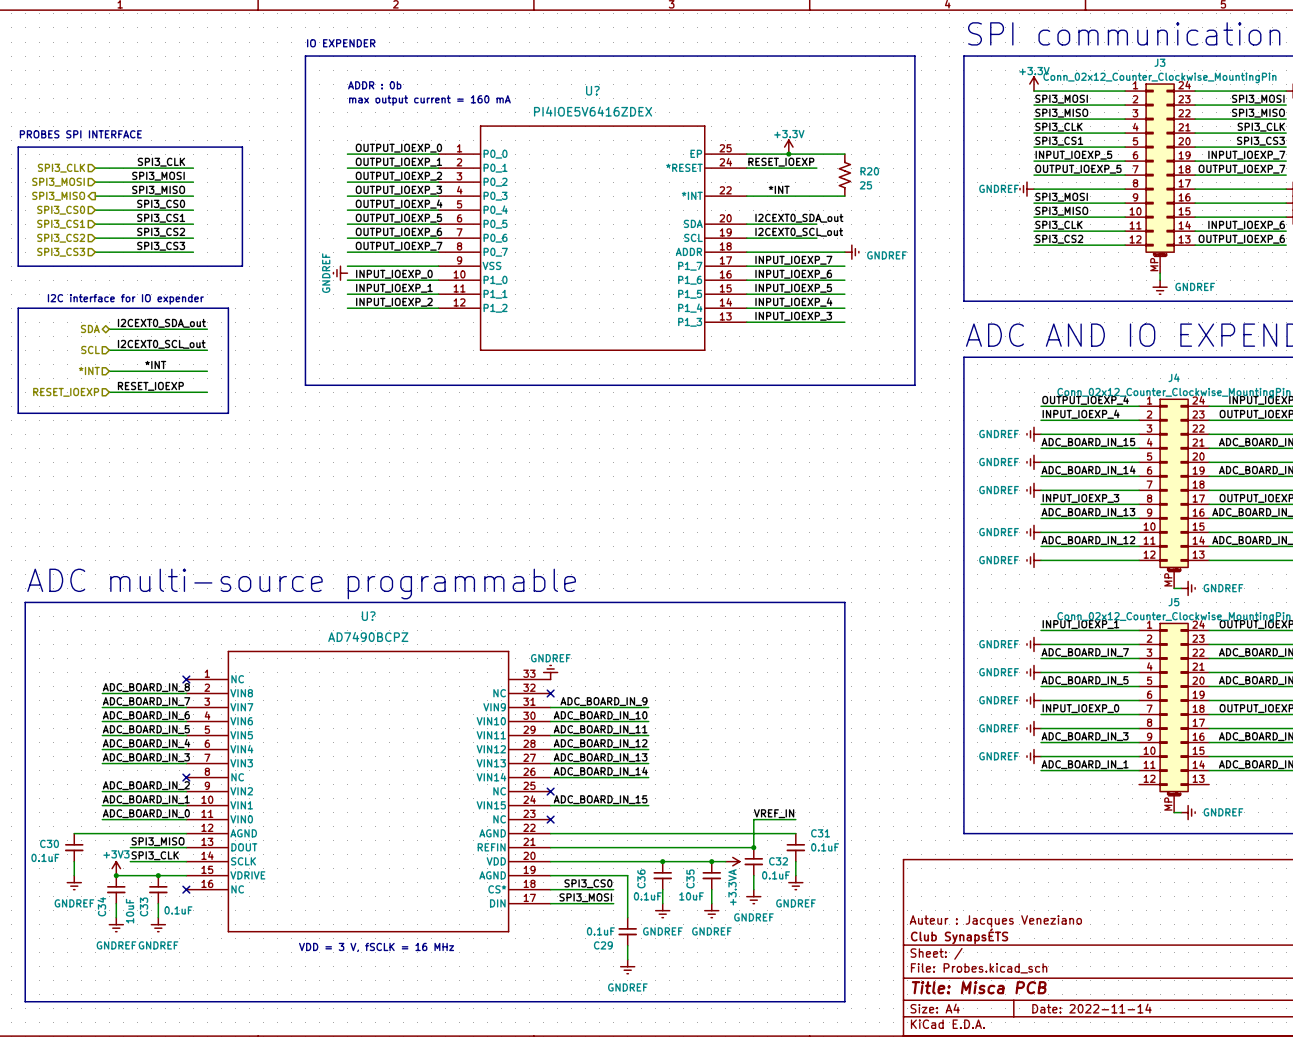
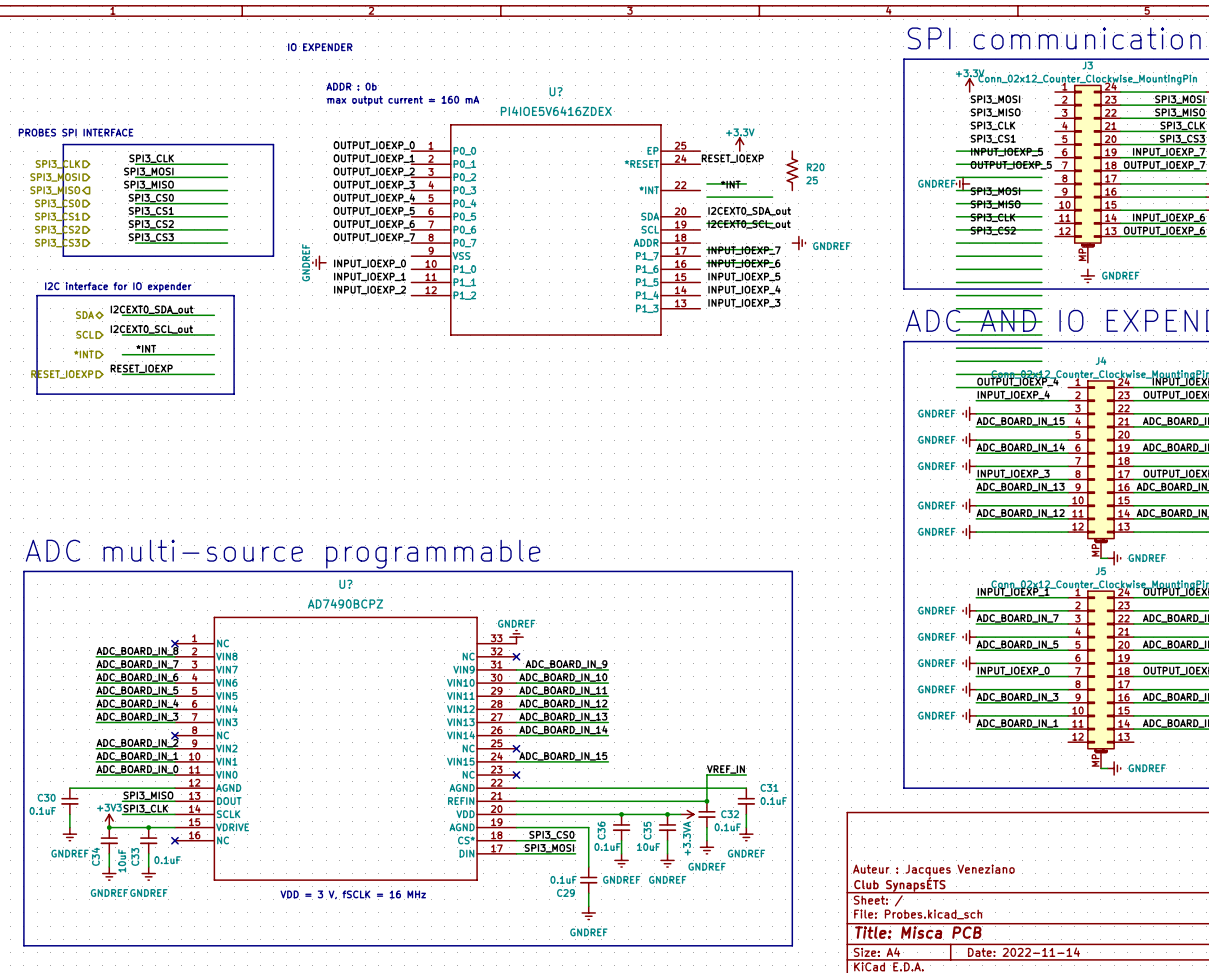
line: (305, 56) (914, 56) (914, 385) (305, 385) (305, 56) -> none
wire: (1034, 91) (1125, 91) -> (956, 151) (1041, 151)
wire: (1034, 105) (1125, 105) -> (956, 164) (1041, 164)
wire: (1034, 119) (1125, 119) -> (956, 177) (1041, 177)
wire: (1034, 133) (1125, 133) -> (956, 190) (1041, 190)
line: (67, 147) (18, 147) (18, 266) (67, 266) -> (63, 144) (63, 256)
line: (242, 147) (242, 266) -> (227, 144) (273, 144) (273, 256) (227, 256)
wire: (1034, 147) (1125, 147) -> (956, 203) (1041, 203)
wire: (347, 154) (438, 154) -> none
wire: (746, 154) (844, 154) -> none
junction: (788, 154) -> none
wire: (1034, 161) (1125, 161) -> (956, 216) (1041, 216)
wire: (95, 168) (144, 168) -> (181, 164) (227, 164)
wire: (347, 168) (438, 168) -> none
wire: (746, 168) (816, 168) -> (706, 197) (772, 197)
wire: (1034, 175) (1125, 175) -> (956, 229) (1041, 229)
wire: (95, 182) (144, 182) -> (181, 177) (227, 177)
wire: (347, 182) (438, 182) -> none
wire: none -> (706, 183) (746, 183)
wire: (1034, 189) (1125, 189) -> (956, 243) (1041, 243)
wire: (95, 196) (144, 196) -> (181, 190) (227, 190)
wire: (347, 196) (438, 196) -> none
wire: (746, 196) (844, 196) -> none
wire: (1034, 203) (1125, 203) -> (956, 256) (1041, 256)
wire: (95, 210) (144, 210) -> (181, 203) (227, 203)
wire: (347, 210) (438, 210) -> none
wire: (1034, 217) (1125, 217) -> (956, 269) (1041, 269)
wire: (95, 224) (144, 224) -> (181, 216) (227, 216)
wire: (347, 224) (438, 224) -> none
wire: (746, 224) (816, 224) -> (706, 249) (772, 249)
wire: none -> (706, 223) (772, 223)
wire: (1034, 231) (1125, 231) -> (956, 282) (1041, 282)
wire: (95, 238) (144, 238) -> (181, 229) (227, 229)
wire: (347, 238) (438, 238) -> none
wire: (746, 238) (816, 238) -> (706, 262) (772, 262)
wire: (1034, 245) (1125, 245) -> (956, 295) (1041, 295)
wire: (95, 252) (144, 252) -> (181, 243) (227, 243)
wire: (347, 252) (438, 252) -> none
wire: (746, 252) (844, 252) -> none
wire: (347, 266) (438, 266) -> none
wire: (746, 266) (844, 266) -> none
wire: (1160, 273) (1160, 280) -> none
wire: (347, 280) (438, 280) -> none
wire: (746, 280) (844, 280) -> none
wire: (347, 294) (438, 294) -> none
wire: (746, 294) (844, 294) -> none
line: (39, 308) (18, 308) (18, 413) (39, 413) -> (37, 295) (37, 394)
line: (228, 308) (228, 413) -> (214, 295) (234, 295) (234, 394) (214, 394)
wire: (347, 308) (438, 308) -> none
wire: (746, 308) (844, 308) -> none
wire: (746, 322) (844, 322) -> none
wire: none -> (956, 308) (1041, 308)
wire: (109, 329) (130, 329) -> (194, 315) (214, 315)
wire: none -> (956, 321) (1041, 321)
wire: (109, 350) (130, 350) -> (194, 335) (214, 335)
wire: none -> (956, 335) (1041, 335)
wire: none -> (956, 348) (1041, 348)
wire: (109, 371) (130, 371) -> (194, 354) (214, 354)
wire: none -> (956, 361) (1041, 361)
wire: (109, 392) (130, 392) -> (194, 374) (214, 374)
wire: none -> (956, 374) (1041, 374)
wire: none -> (956, 387) (976, 387)
wire: (1111, 406) (1139, 406) -> none

